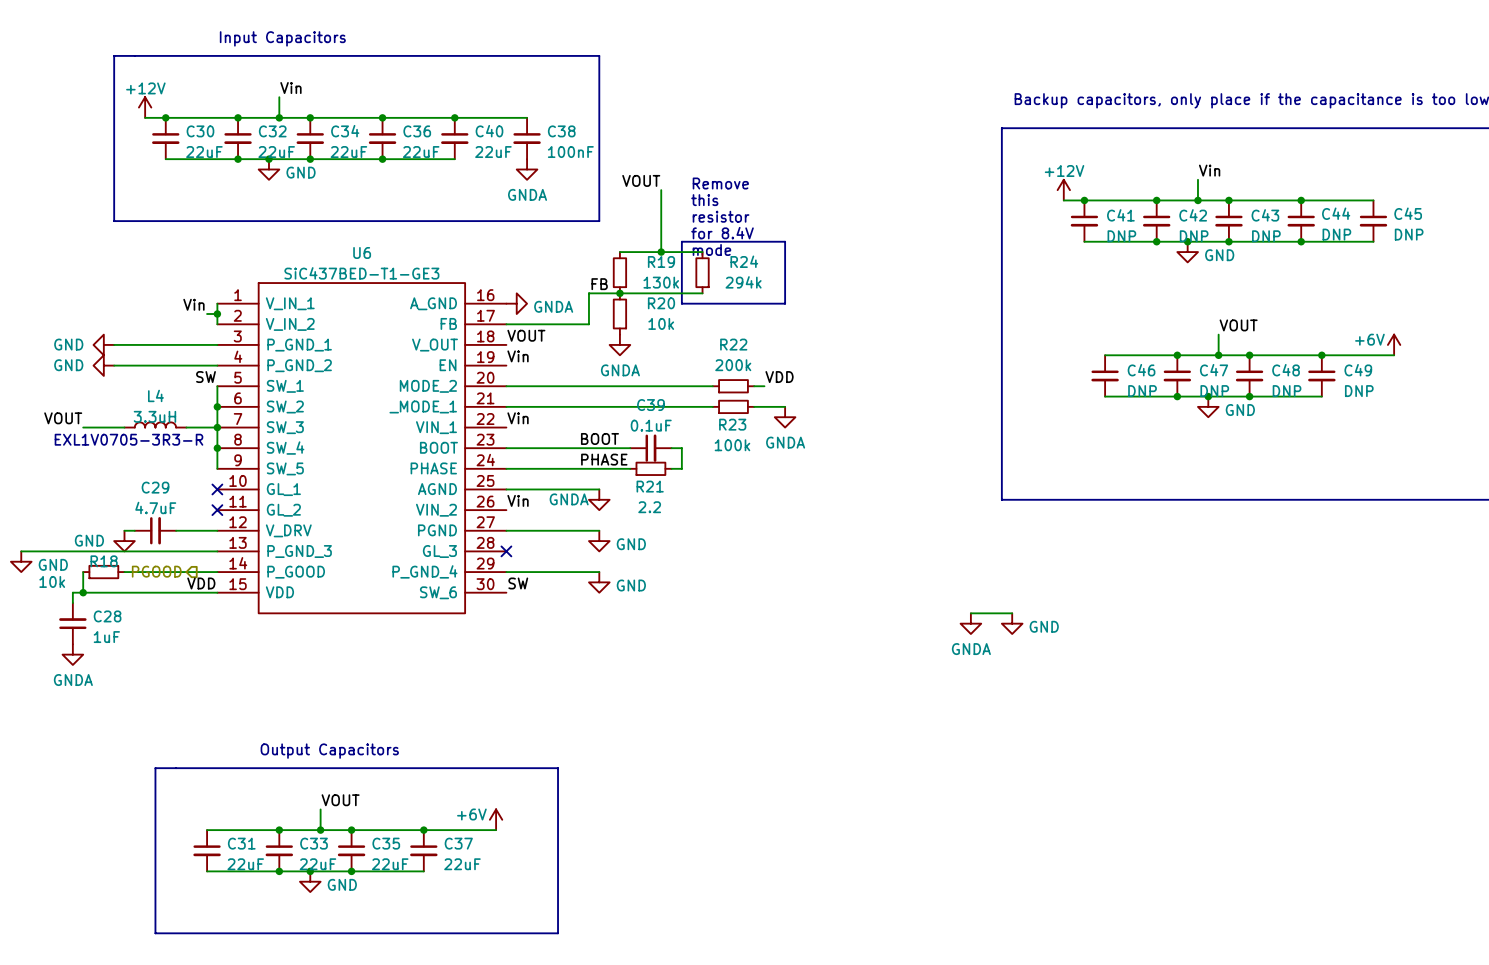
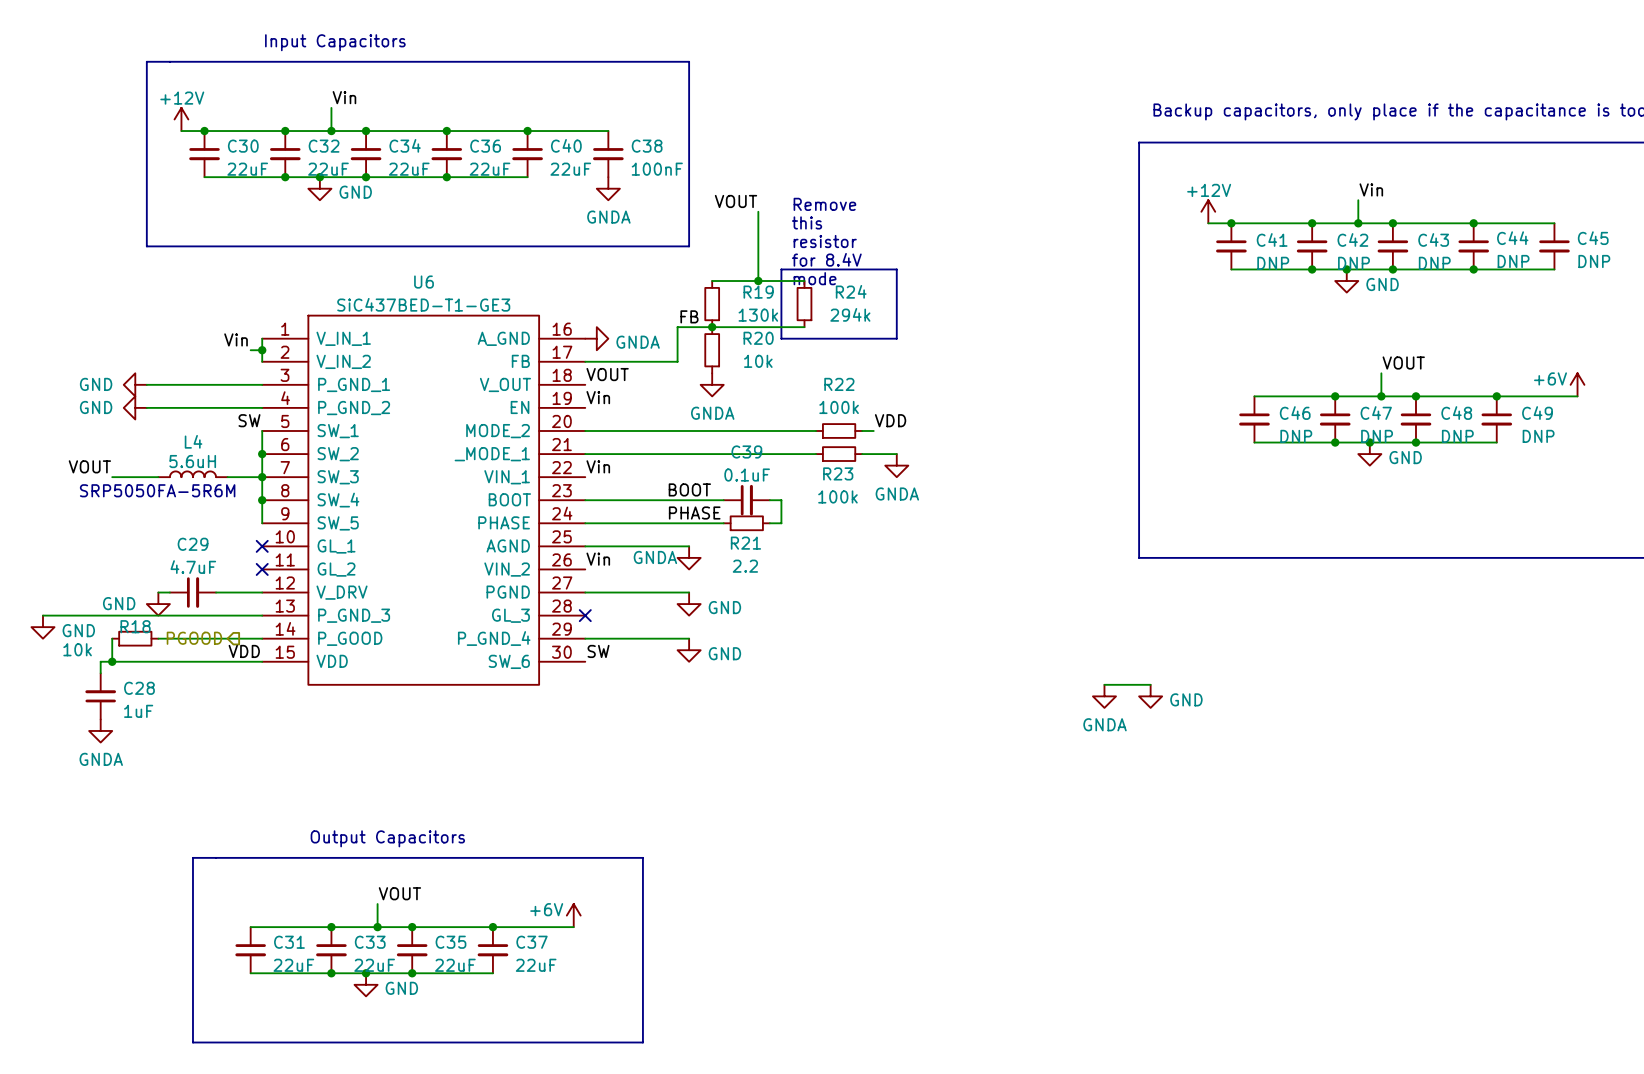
R22 value: 200k (733, 365) -> 100k (839, 407)
L4 value: 3.3uH (154, 416) -> 5.6uH (192, 461)
text: EXL1V0705-3R3-R (128, 439) -> SRP5050FA-5R6M (157, 490)

